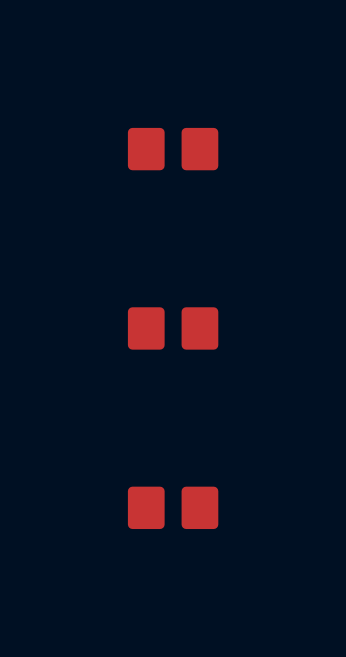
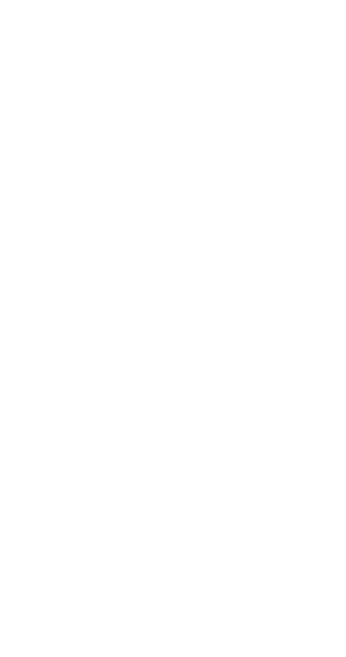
part: (173, 149) -> none
part: (173, 328) -> none
part: (173, 507) -> none

